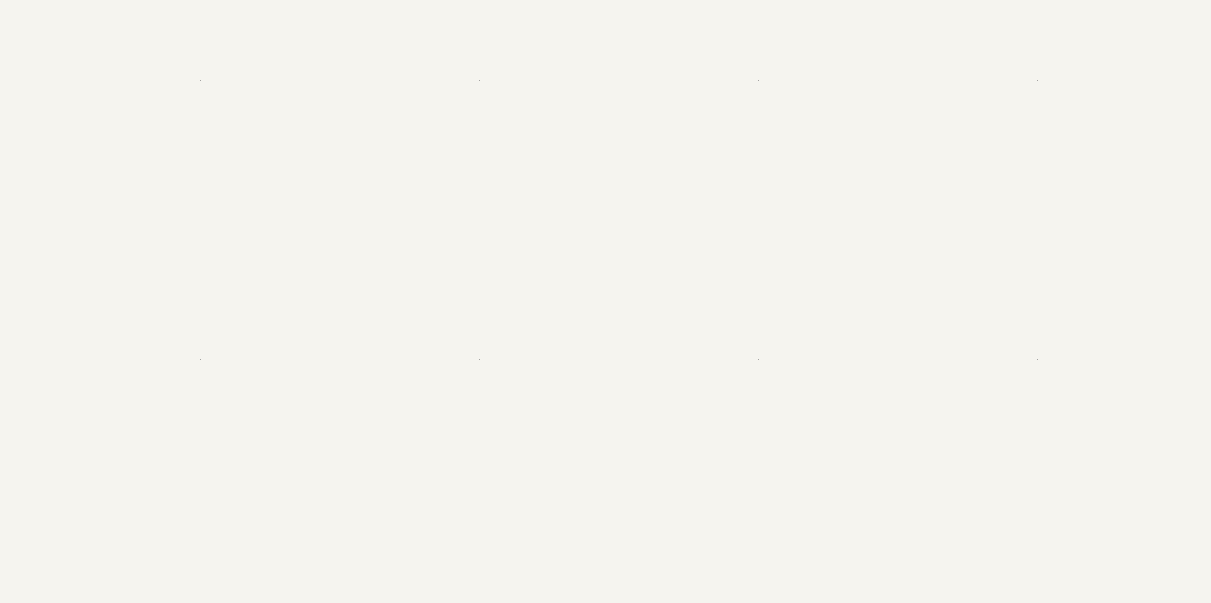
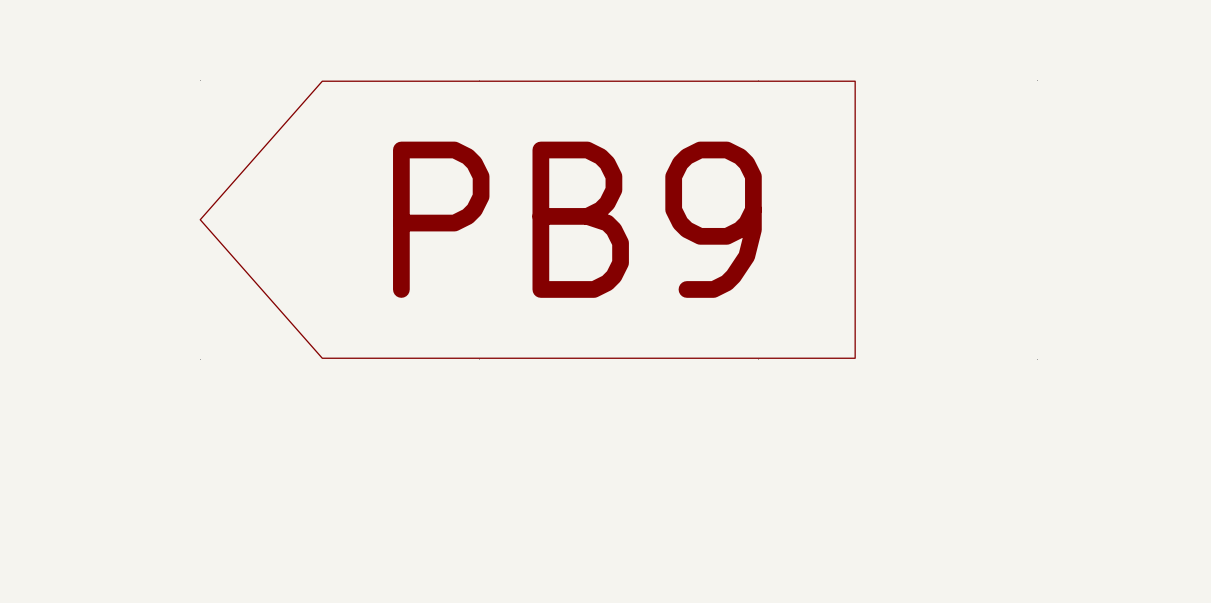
global label: none -> PB9 (577, 219)

